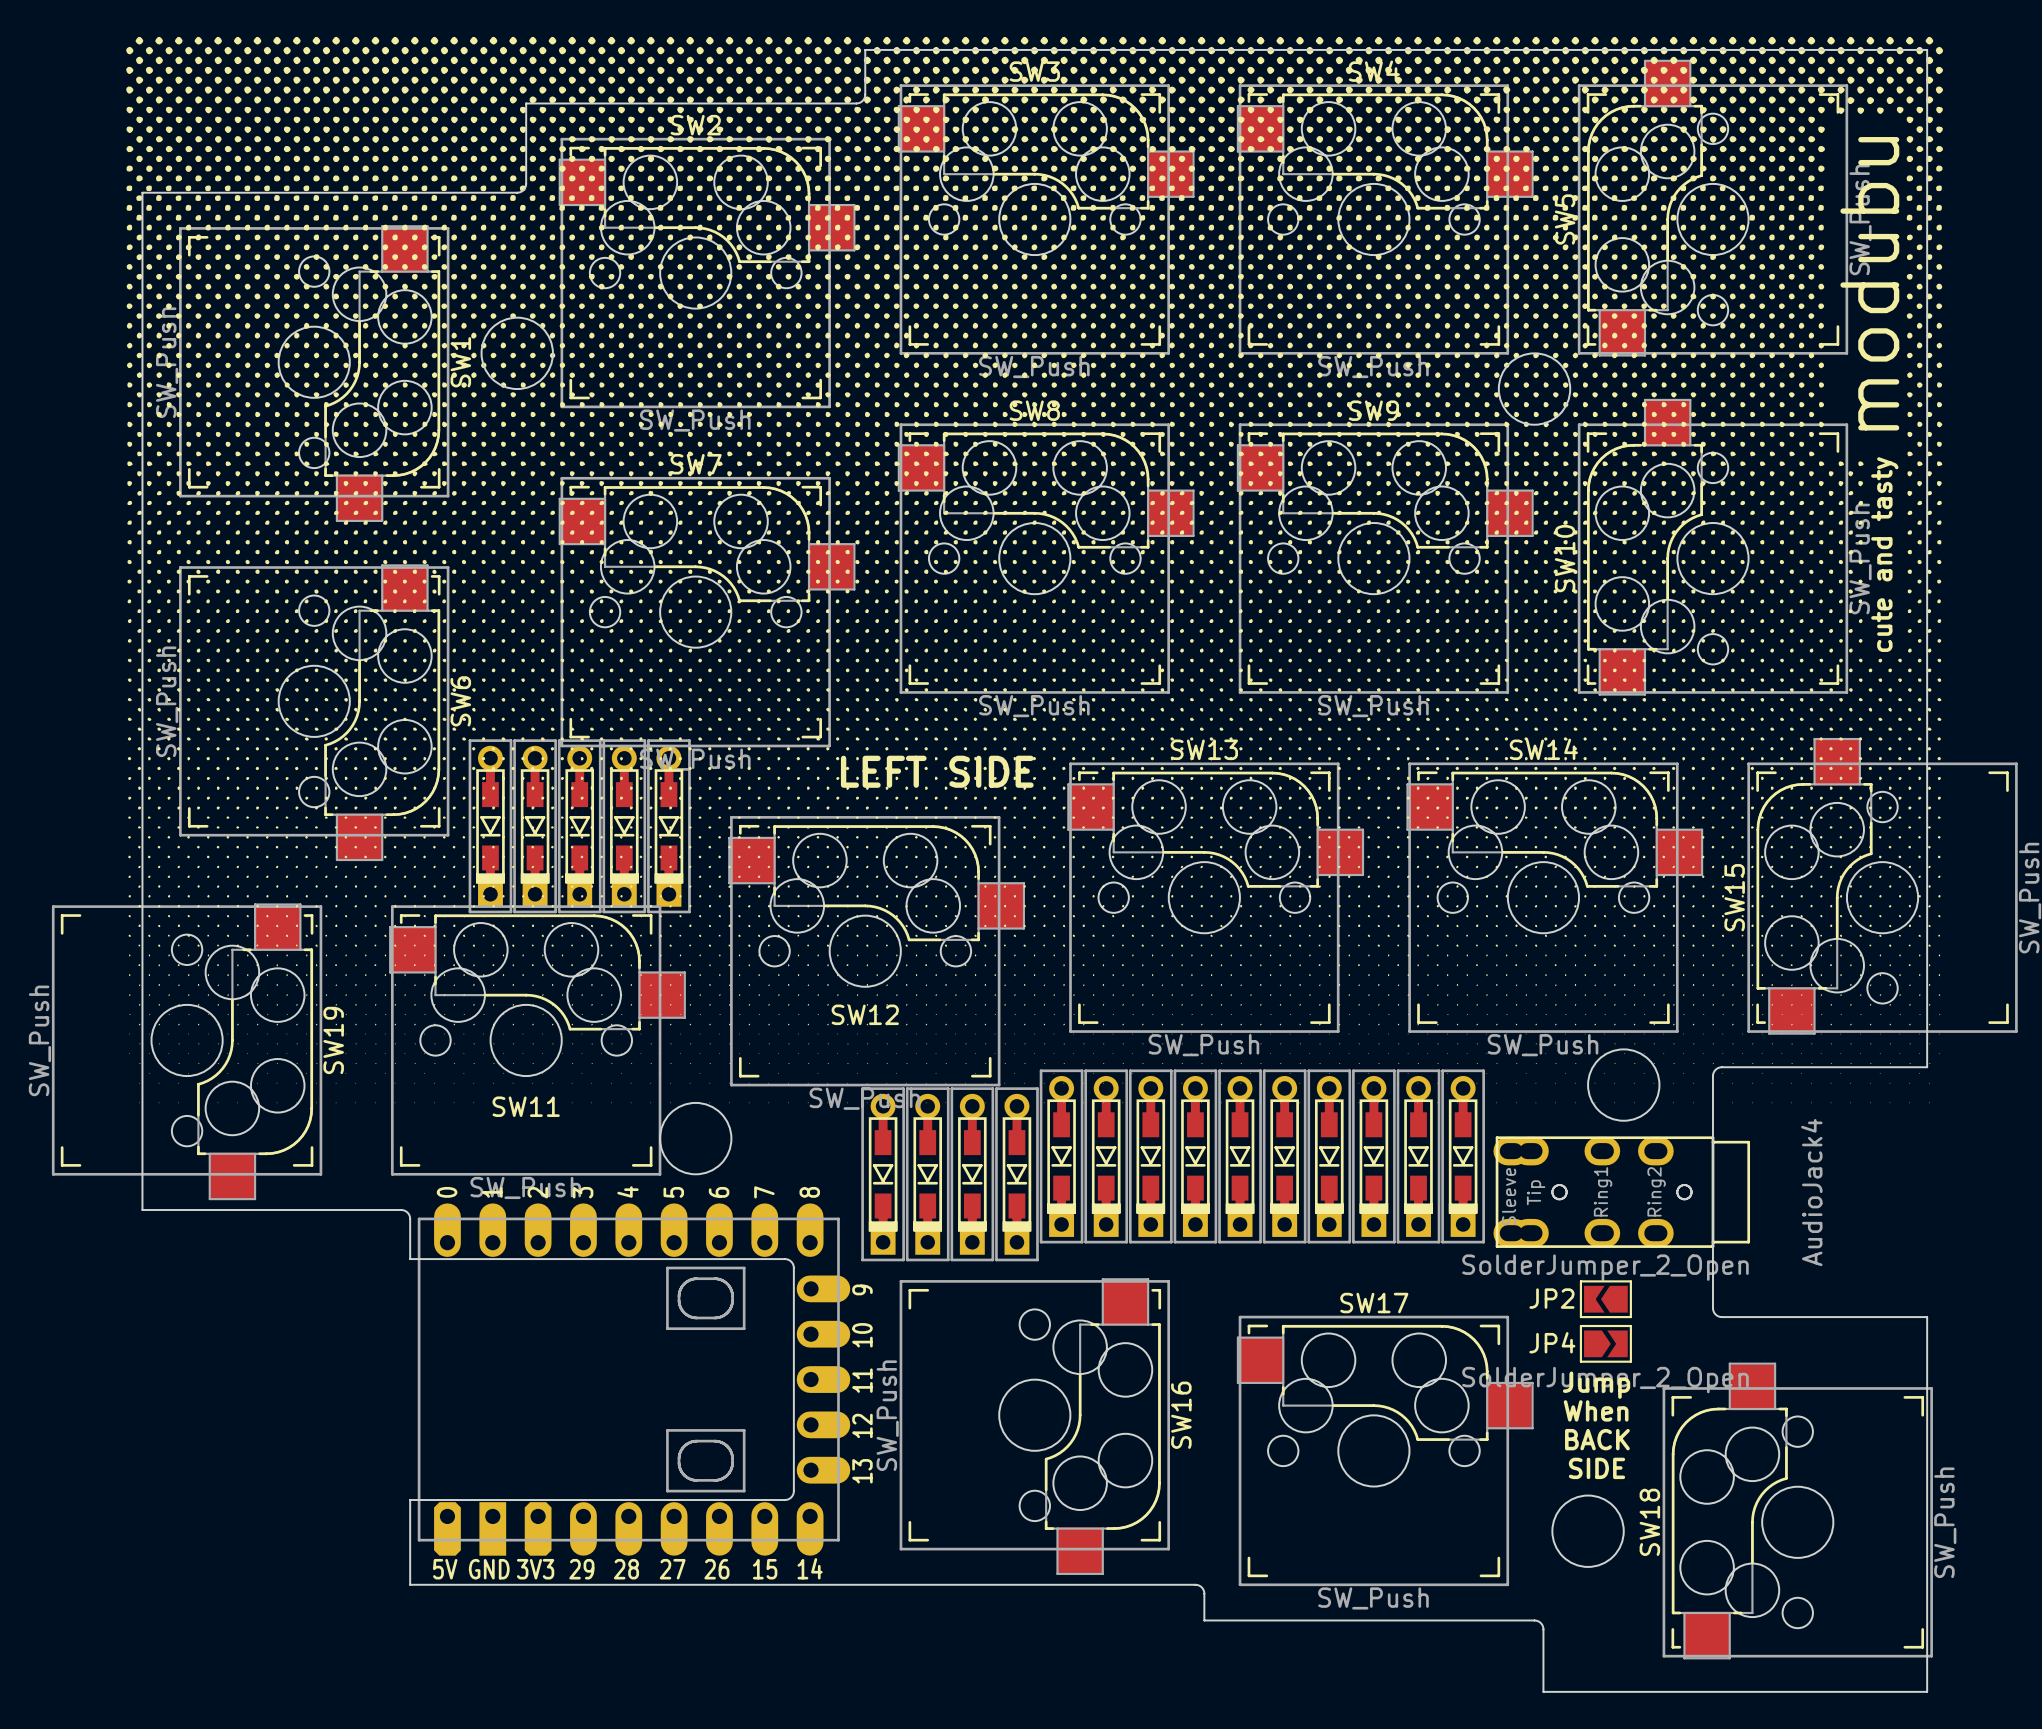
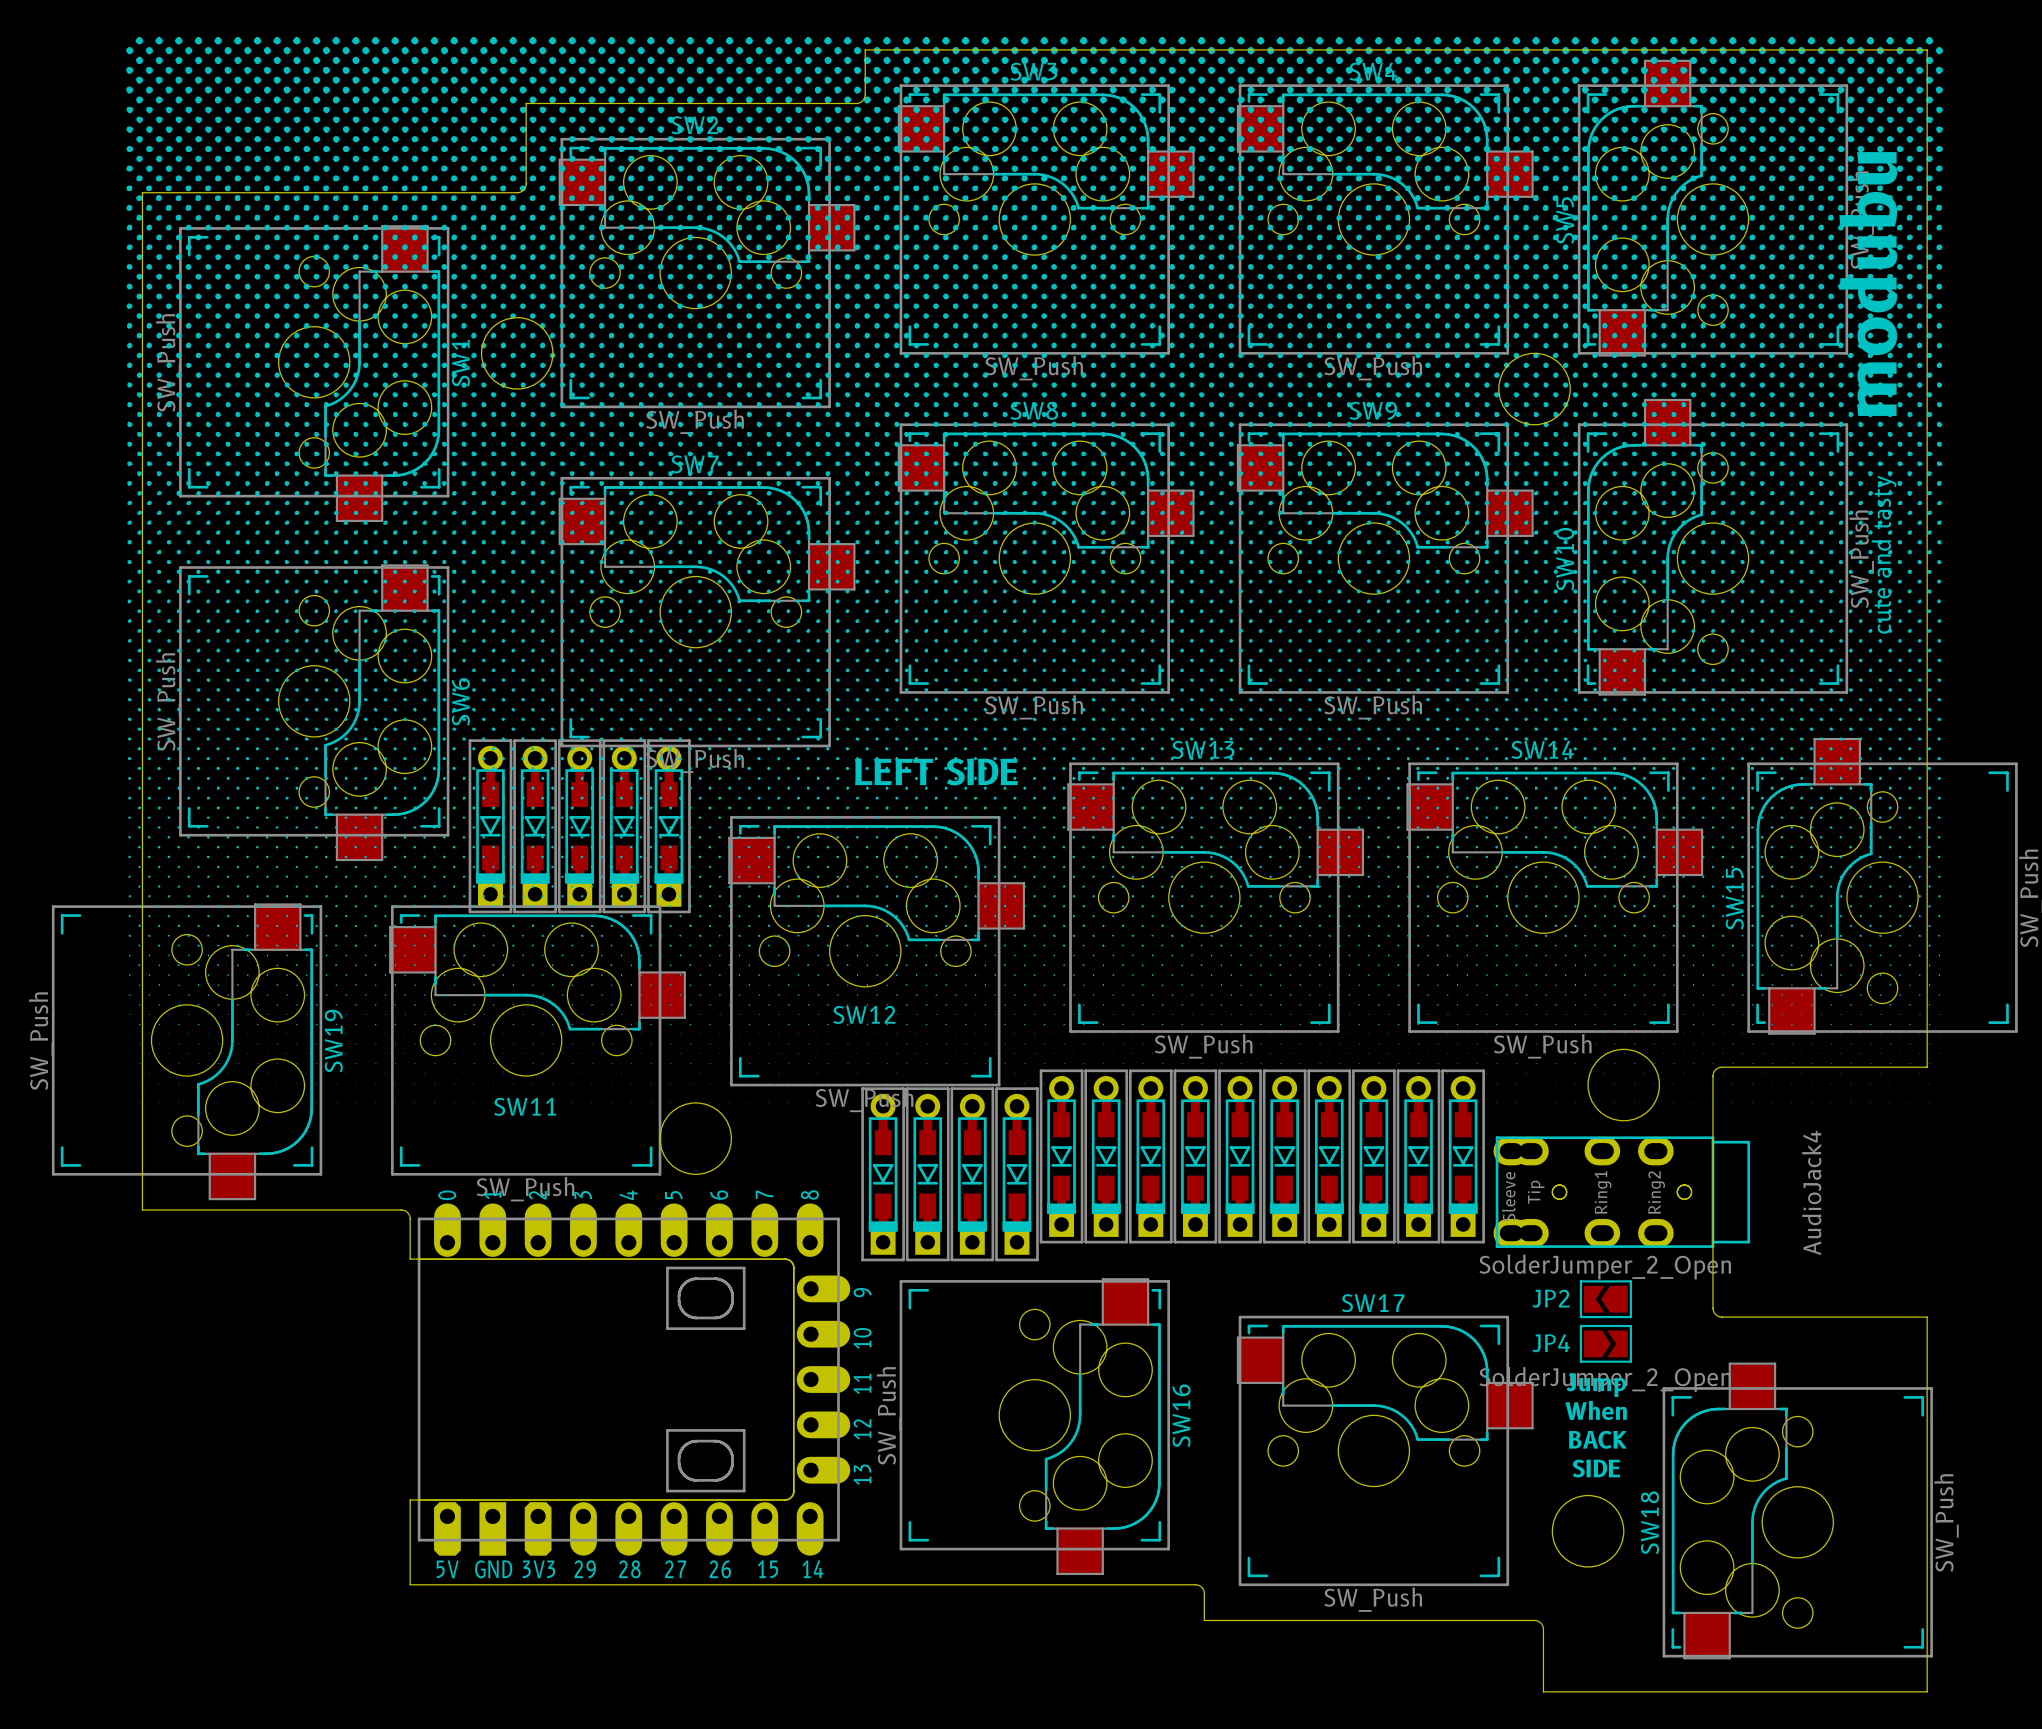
drawing shape: [126, 36, 1944, 1104] -> [126, 36, 1944, 1104]

